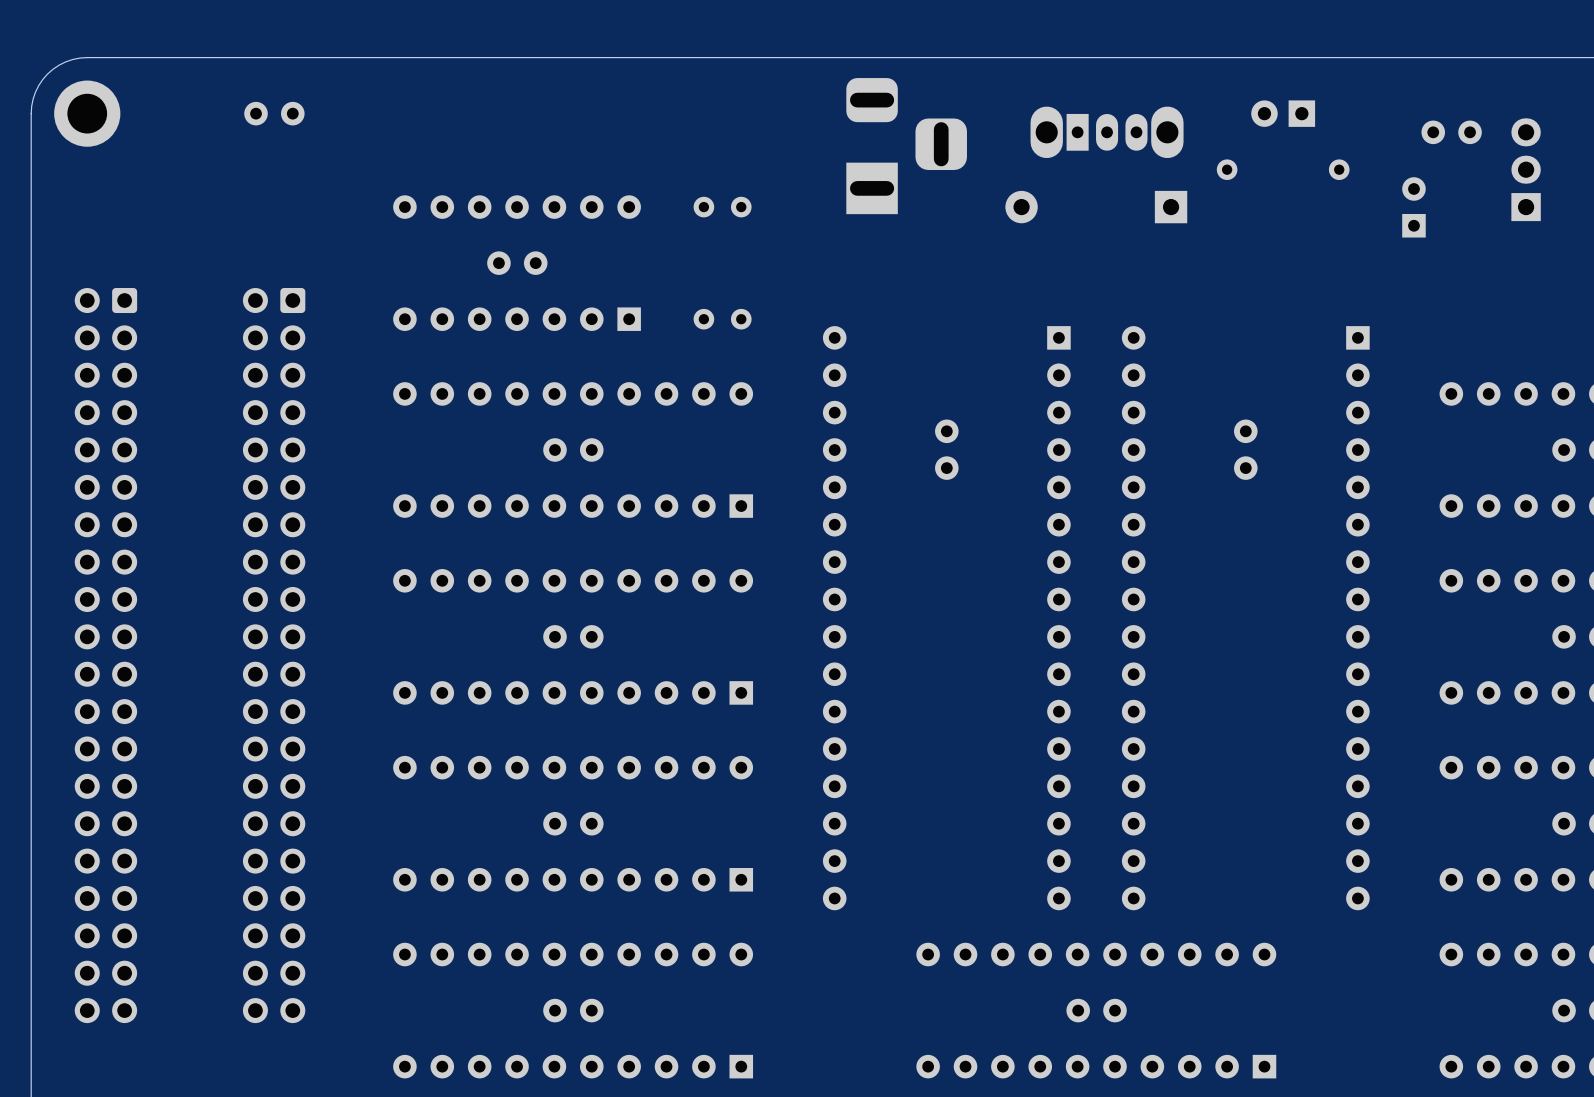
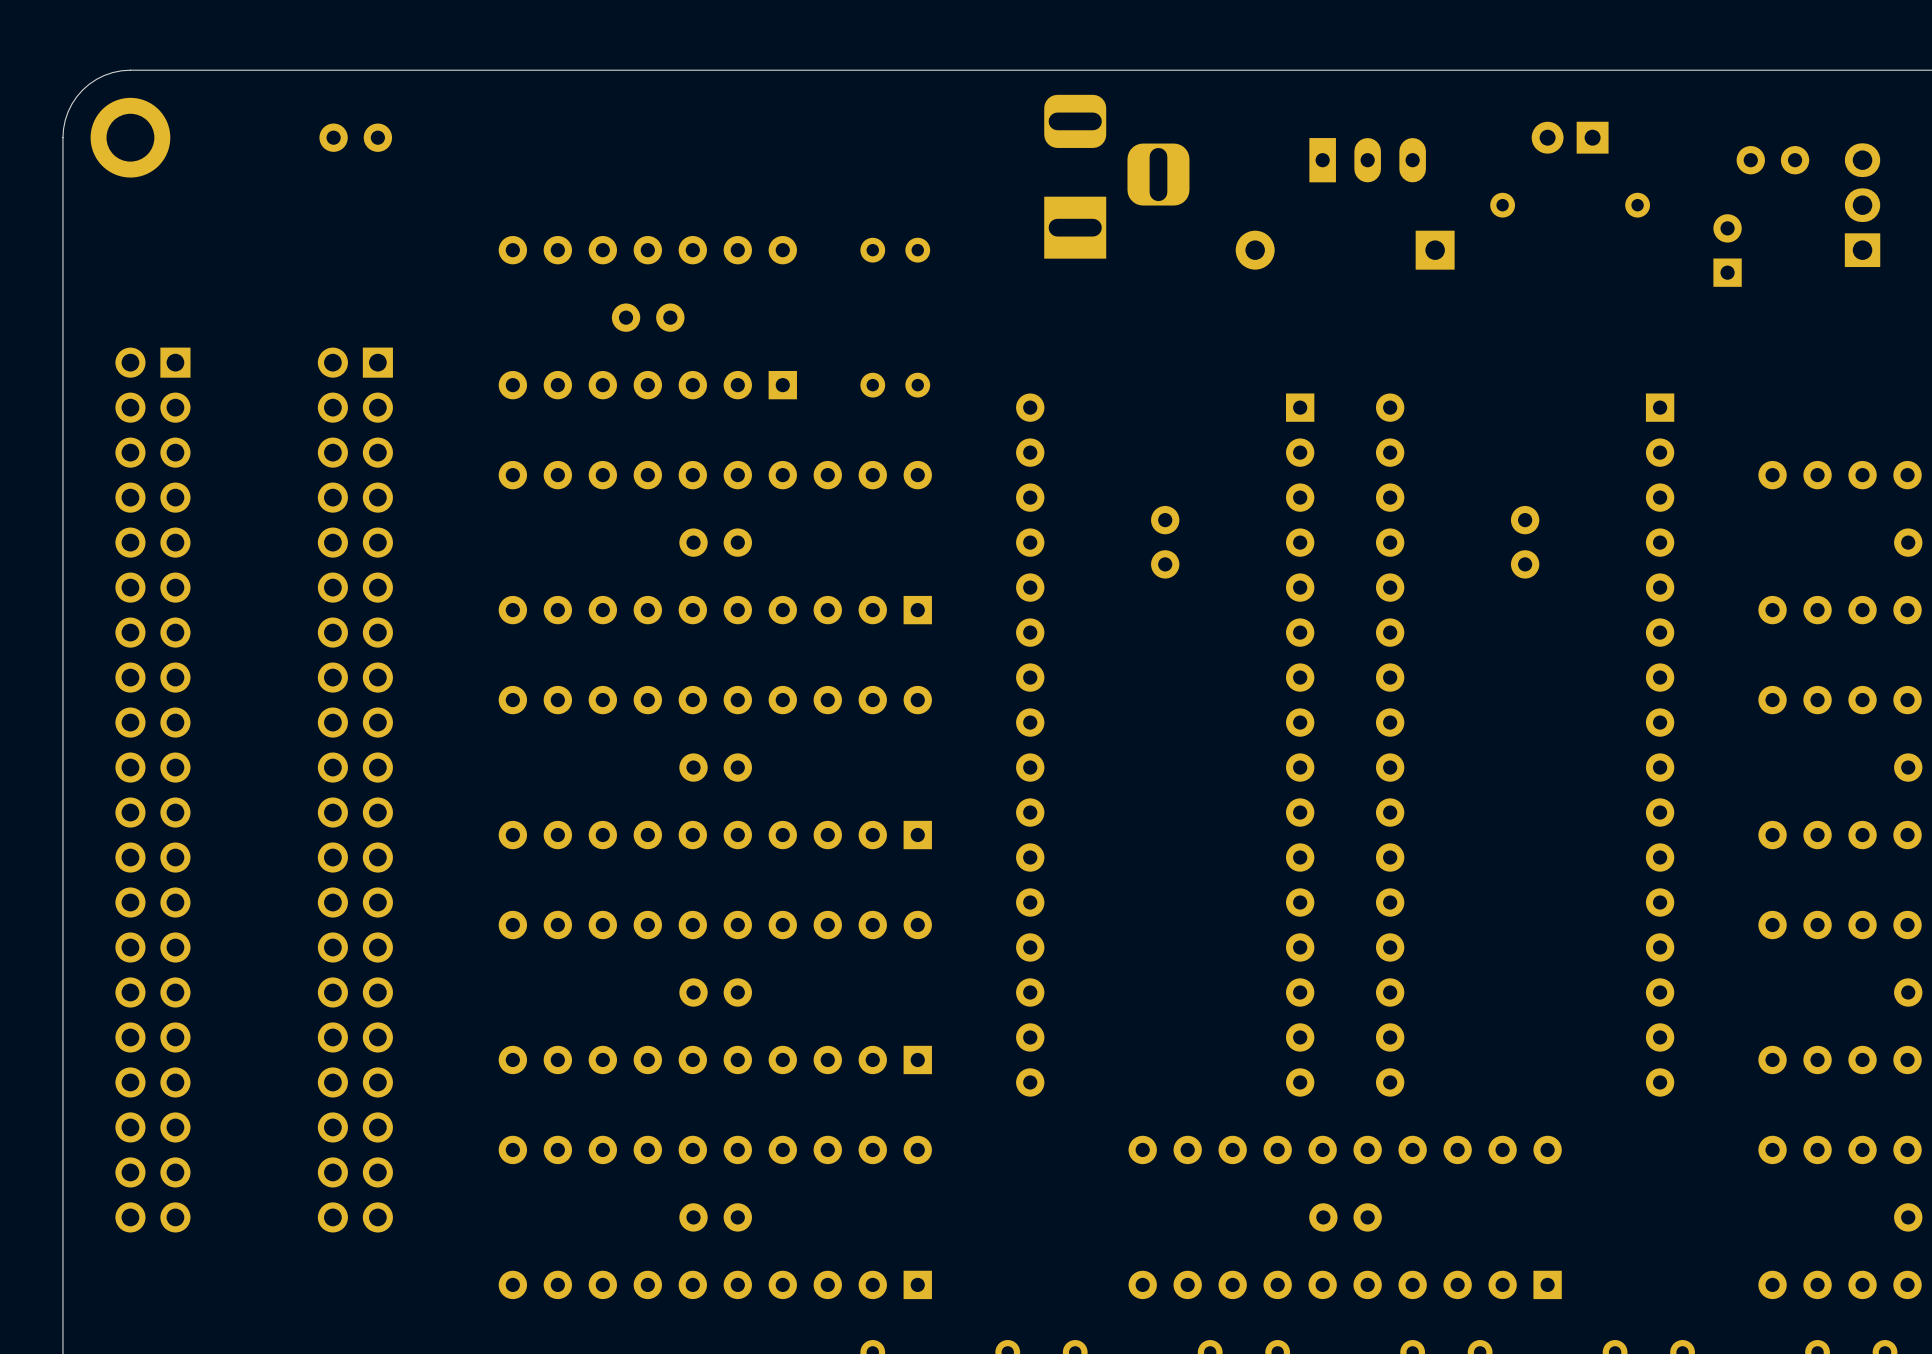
part footprint: [1030, 106, 1184, 159] -> [1309, 138, 1426, 183]
part footprint: [74, 288, 138, 1024] -> [115, 347, 191, 1233]
part footprint: [242, 288, 306, 1024] -> [317, 347, 393, 1233]

